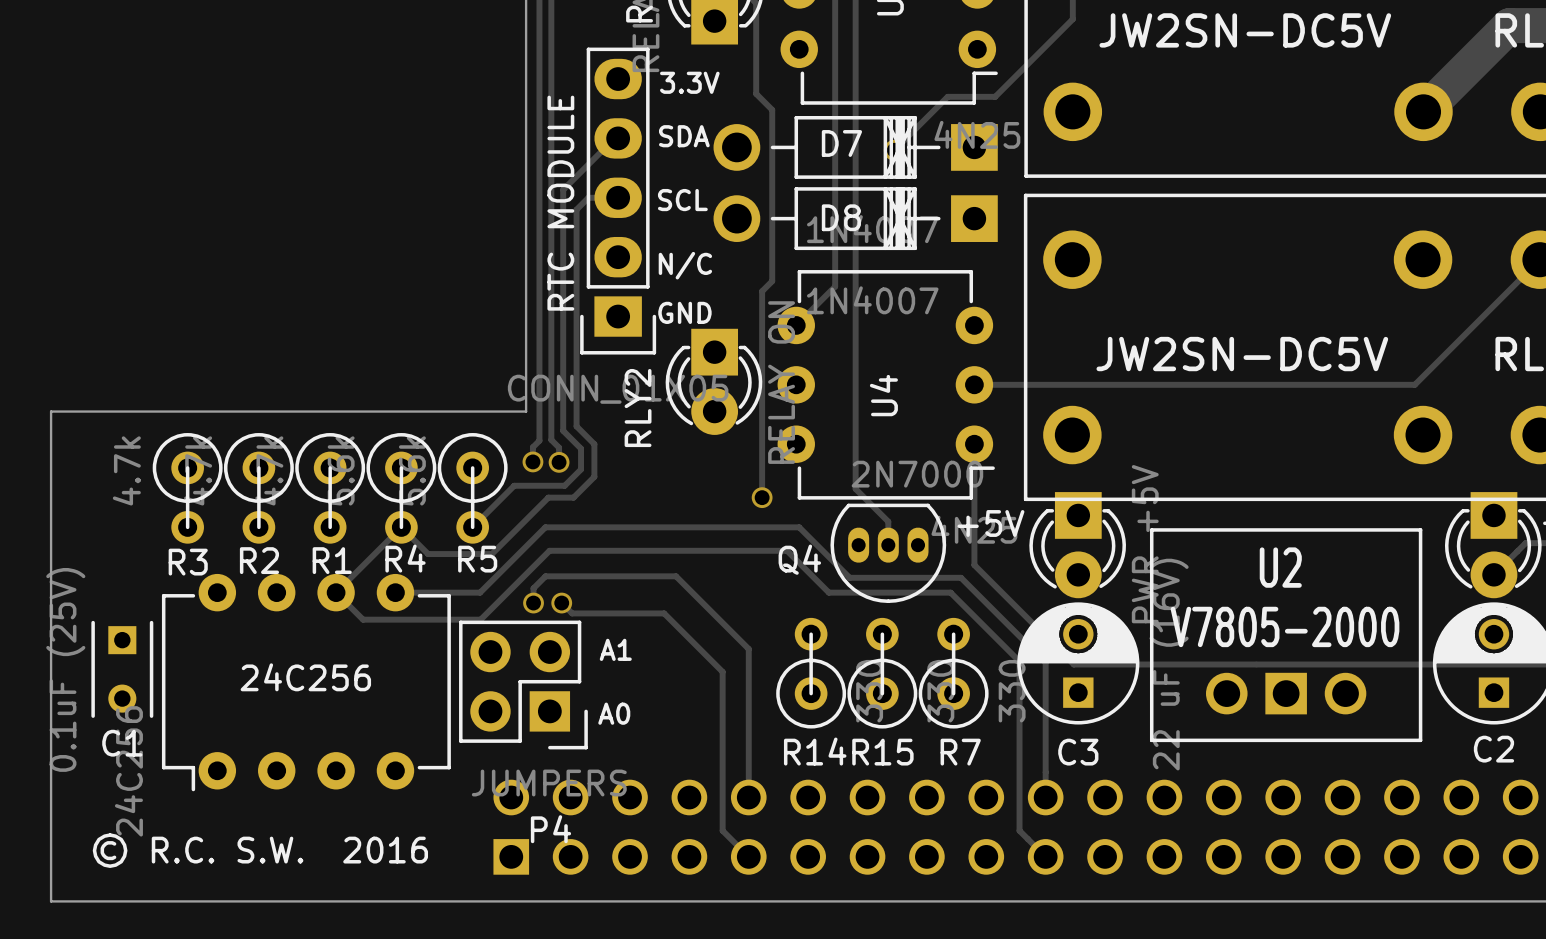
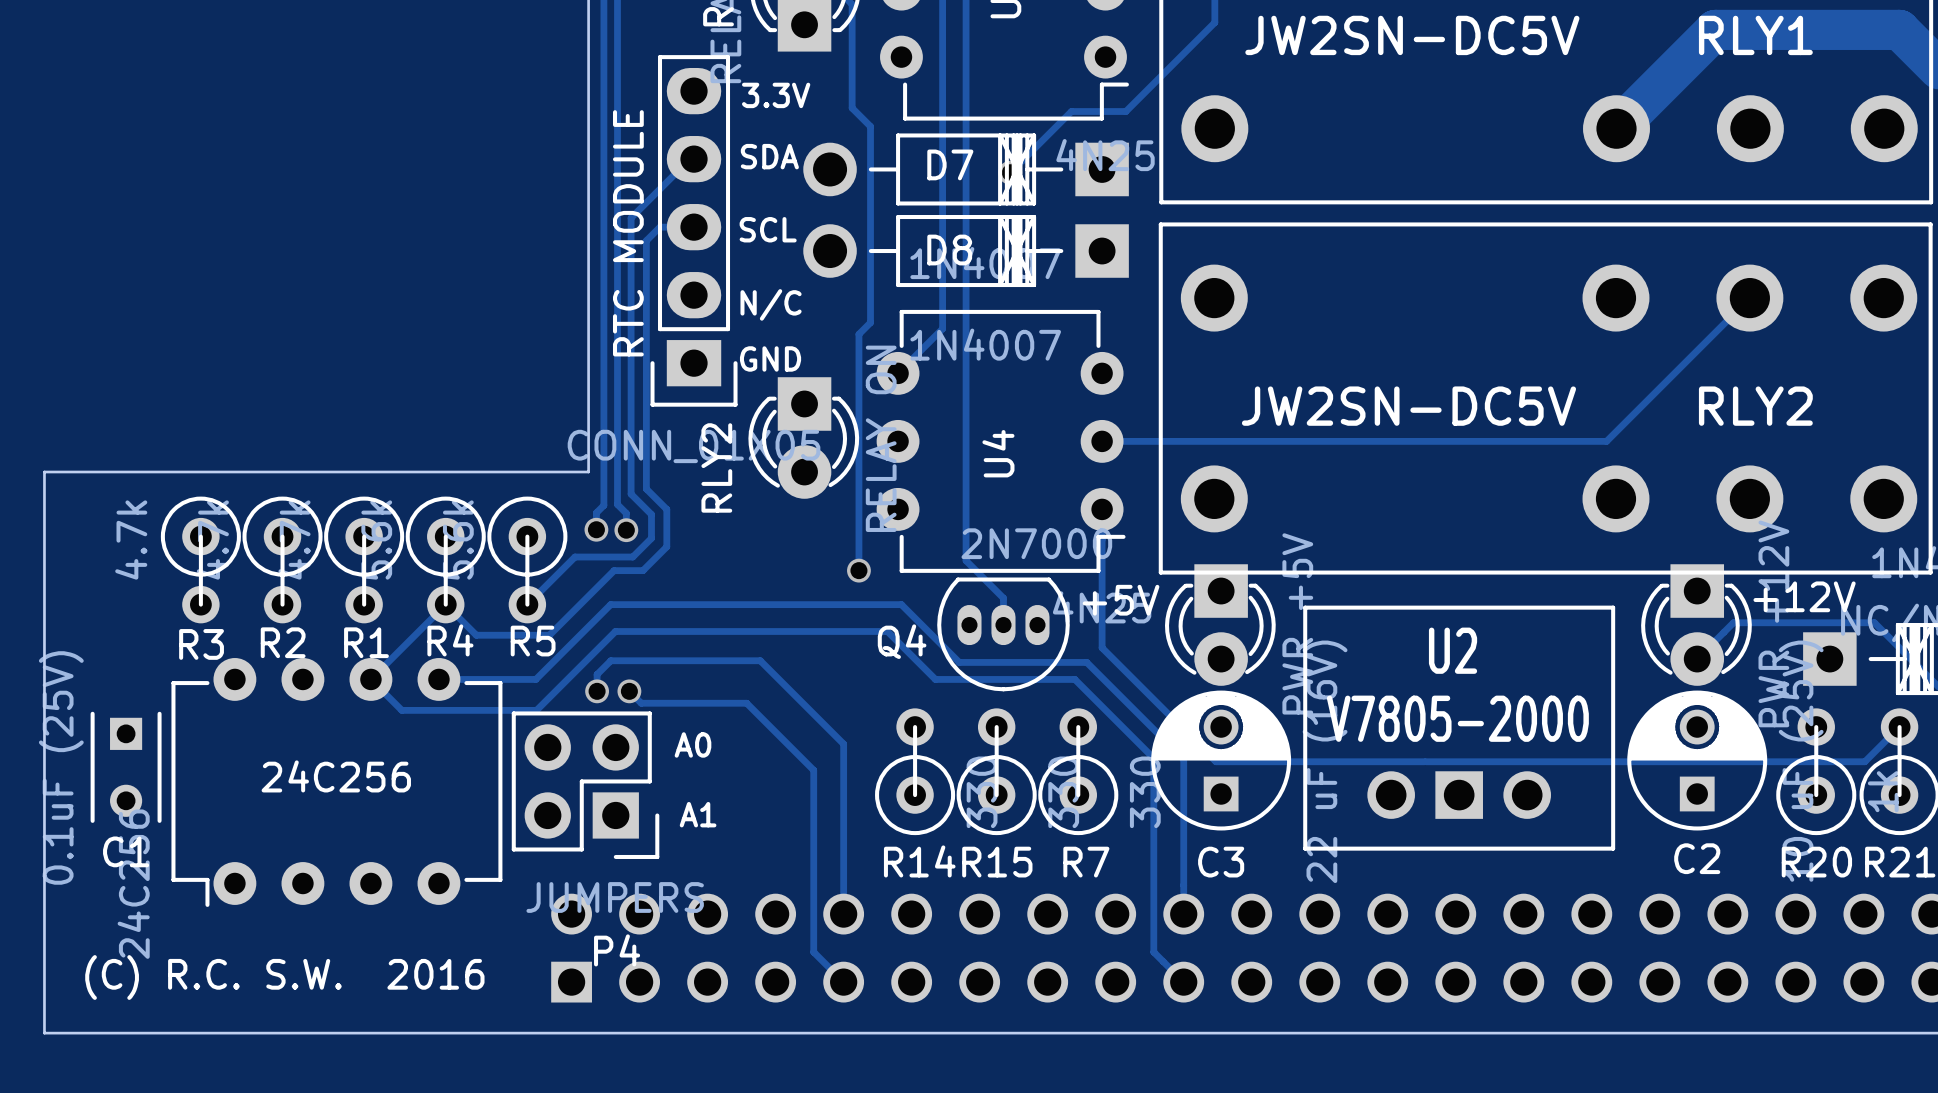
text: A1 (615, 649) -> A0 (692, 744)
text: A0 (614, 713) -> A1 (698, 814)
text: © R.C. S.W. 2016 (260, 850) -> (C) R.C. S.W. 2016 (284, 977)

